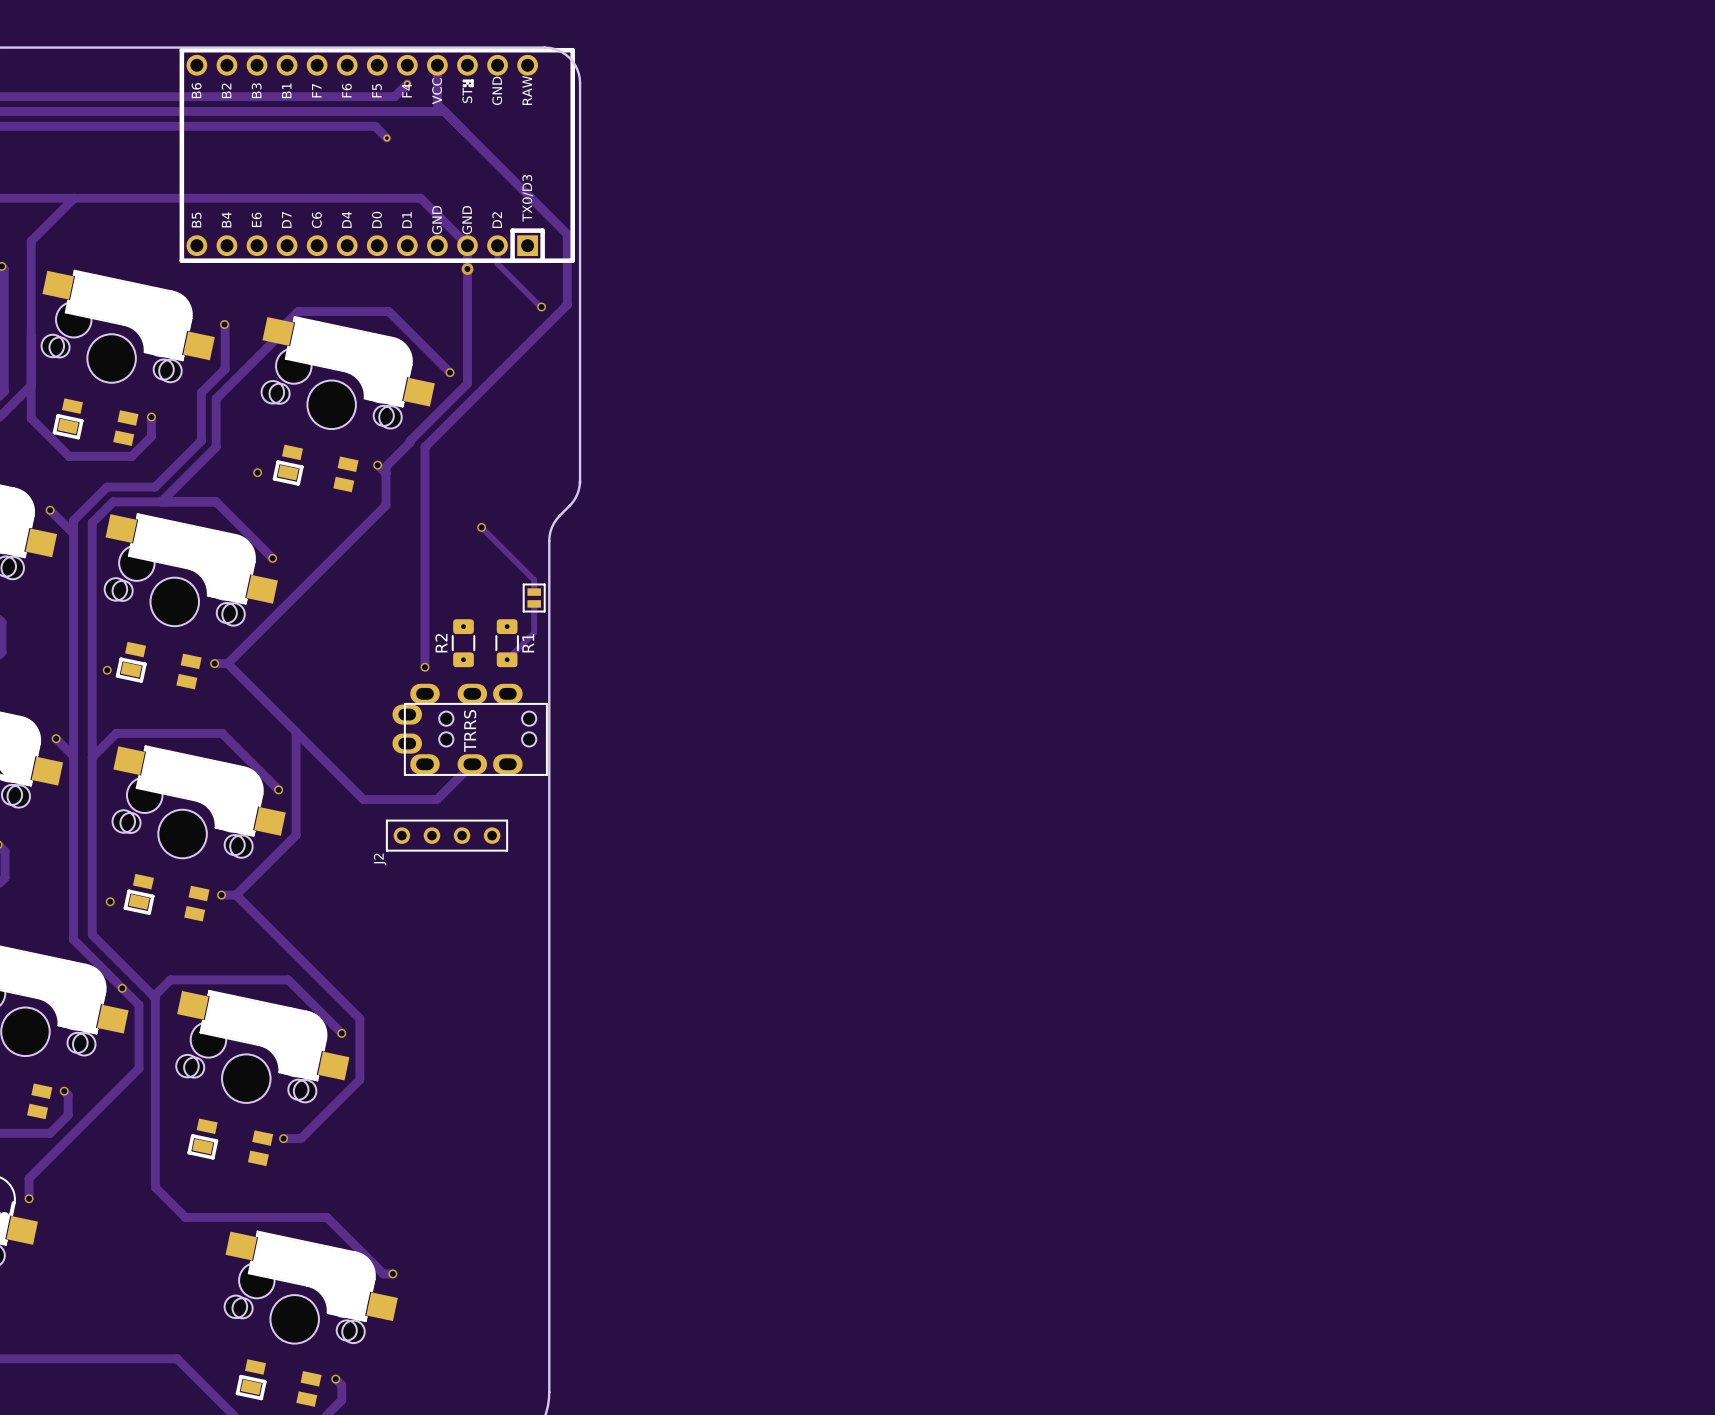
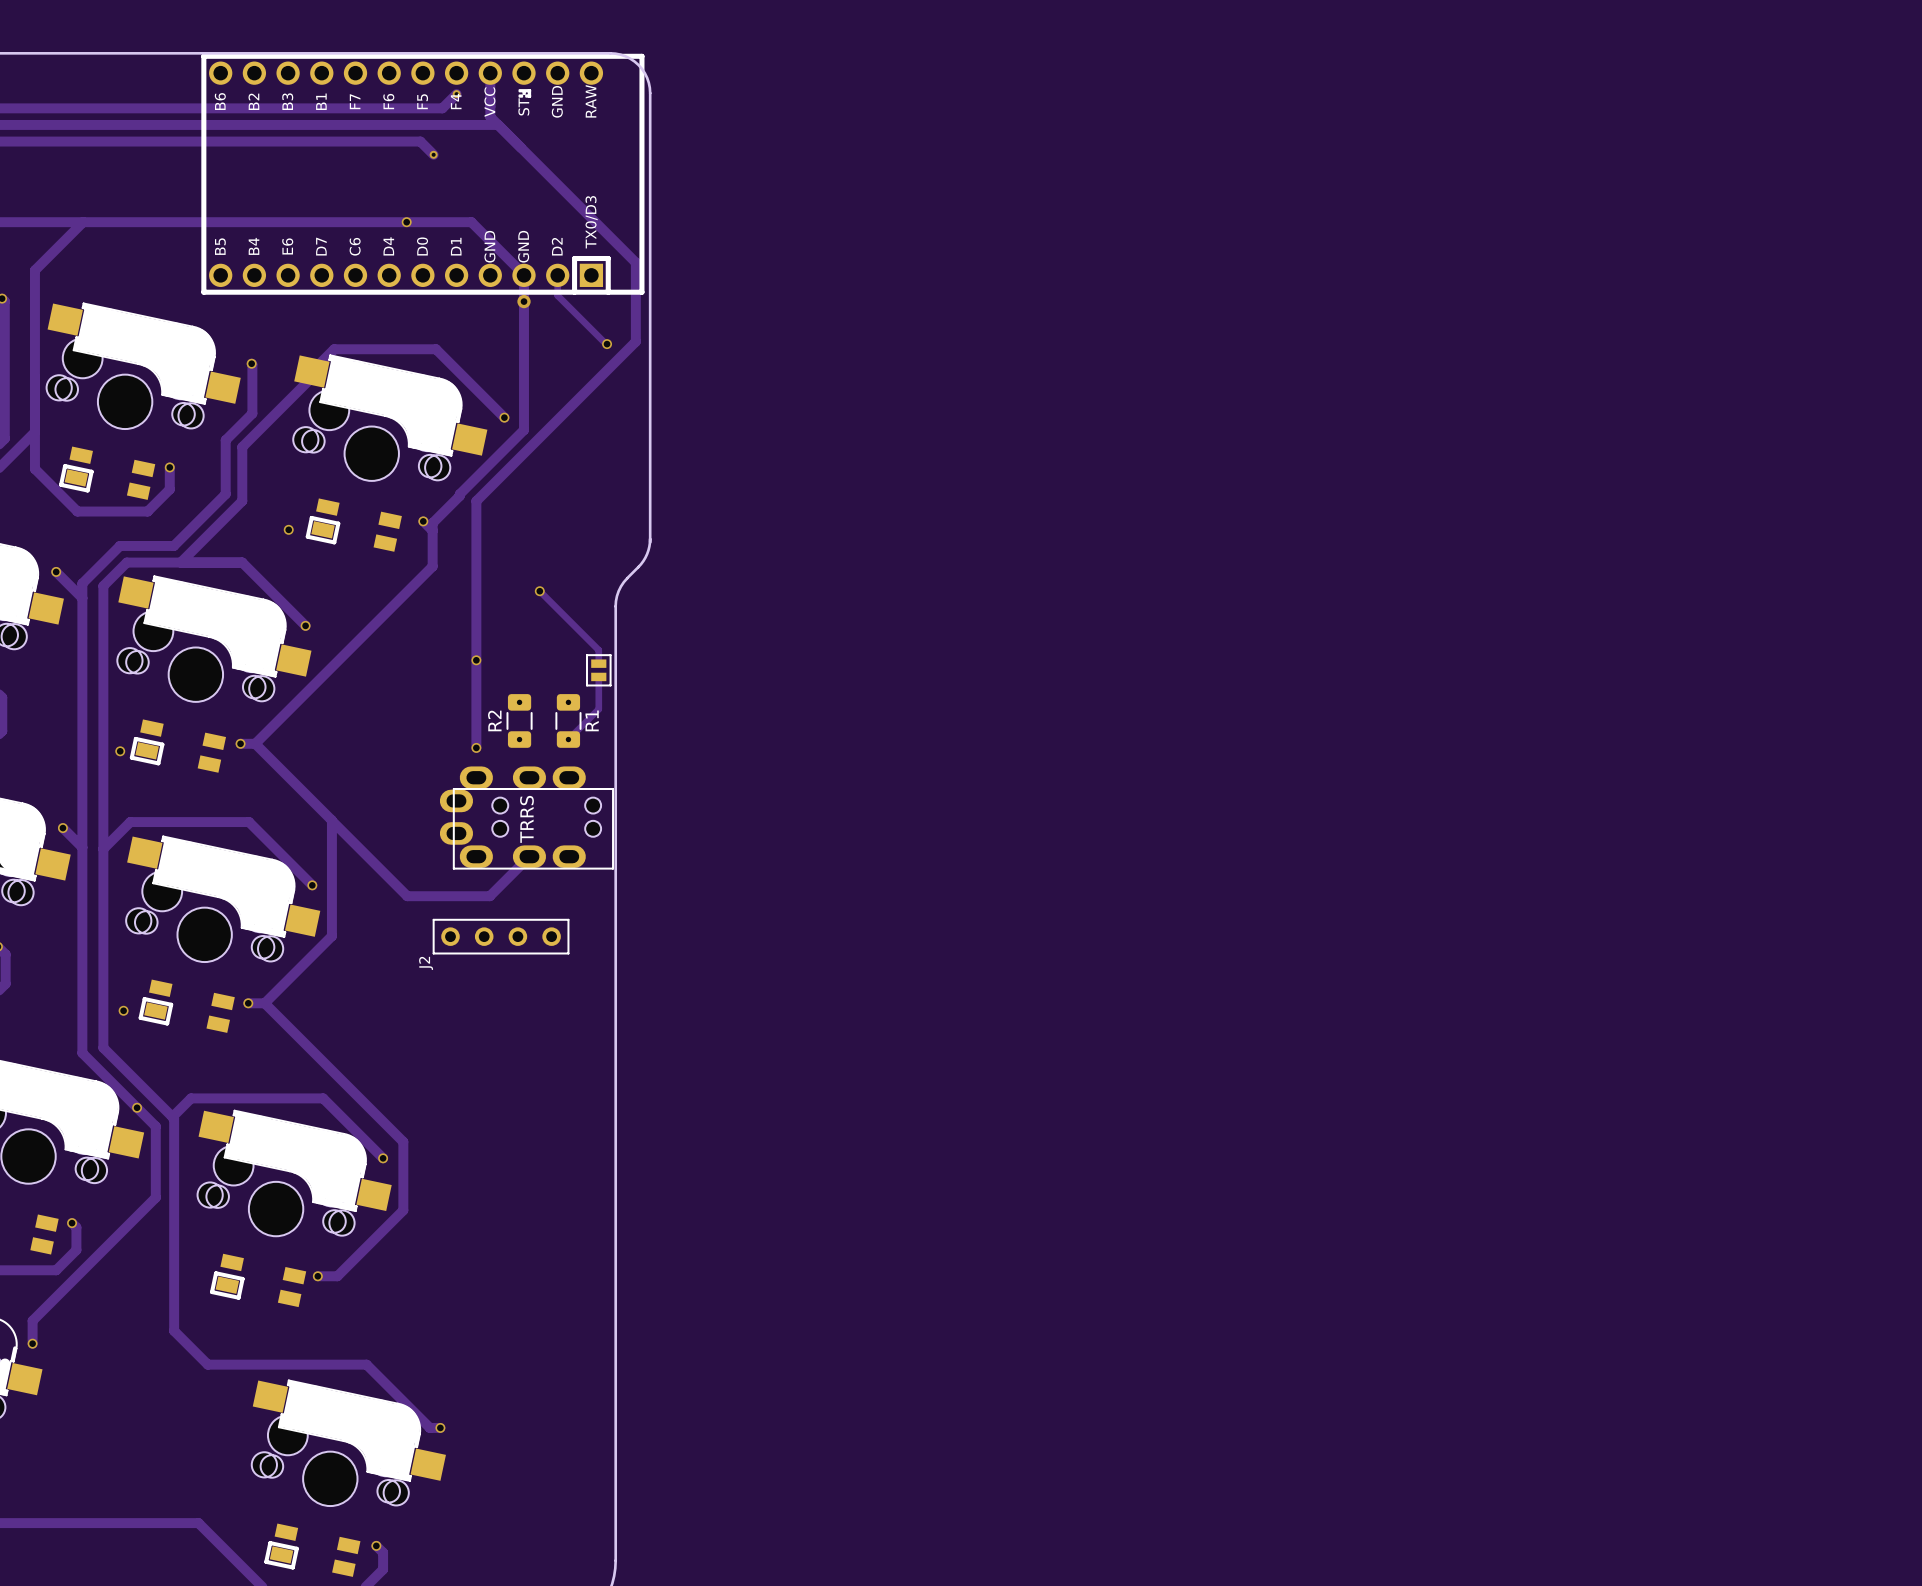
via: none -> (406, 222)
via: none -> (476, 660)

